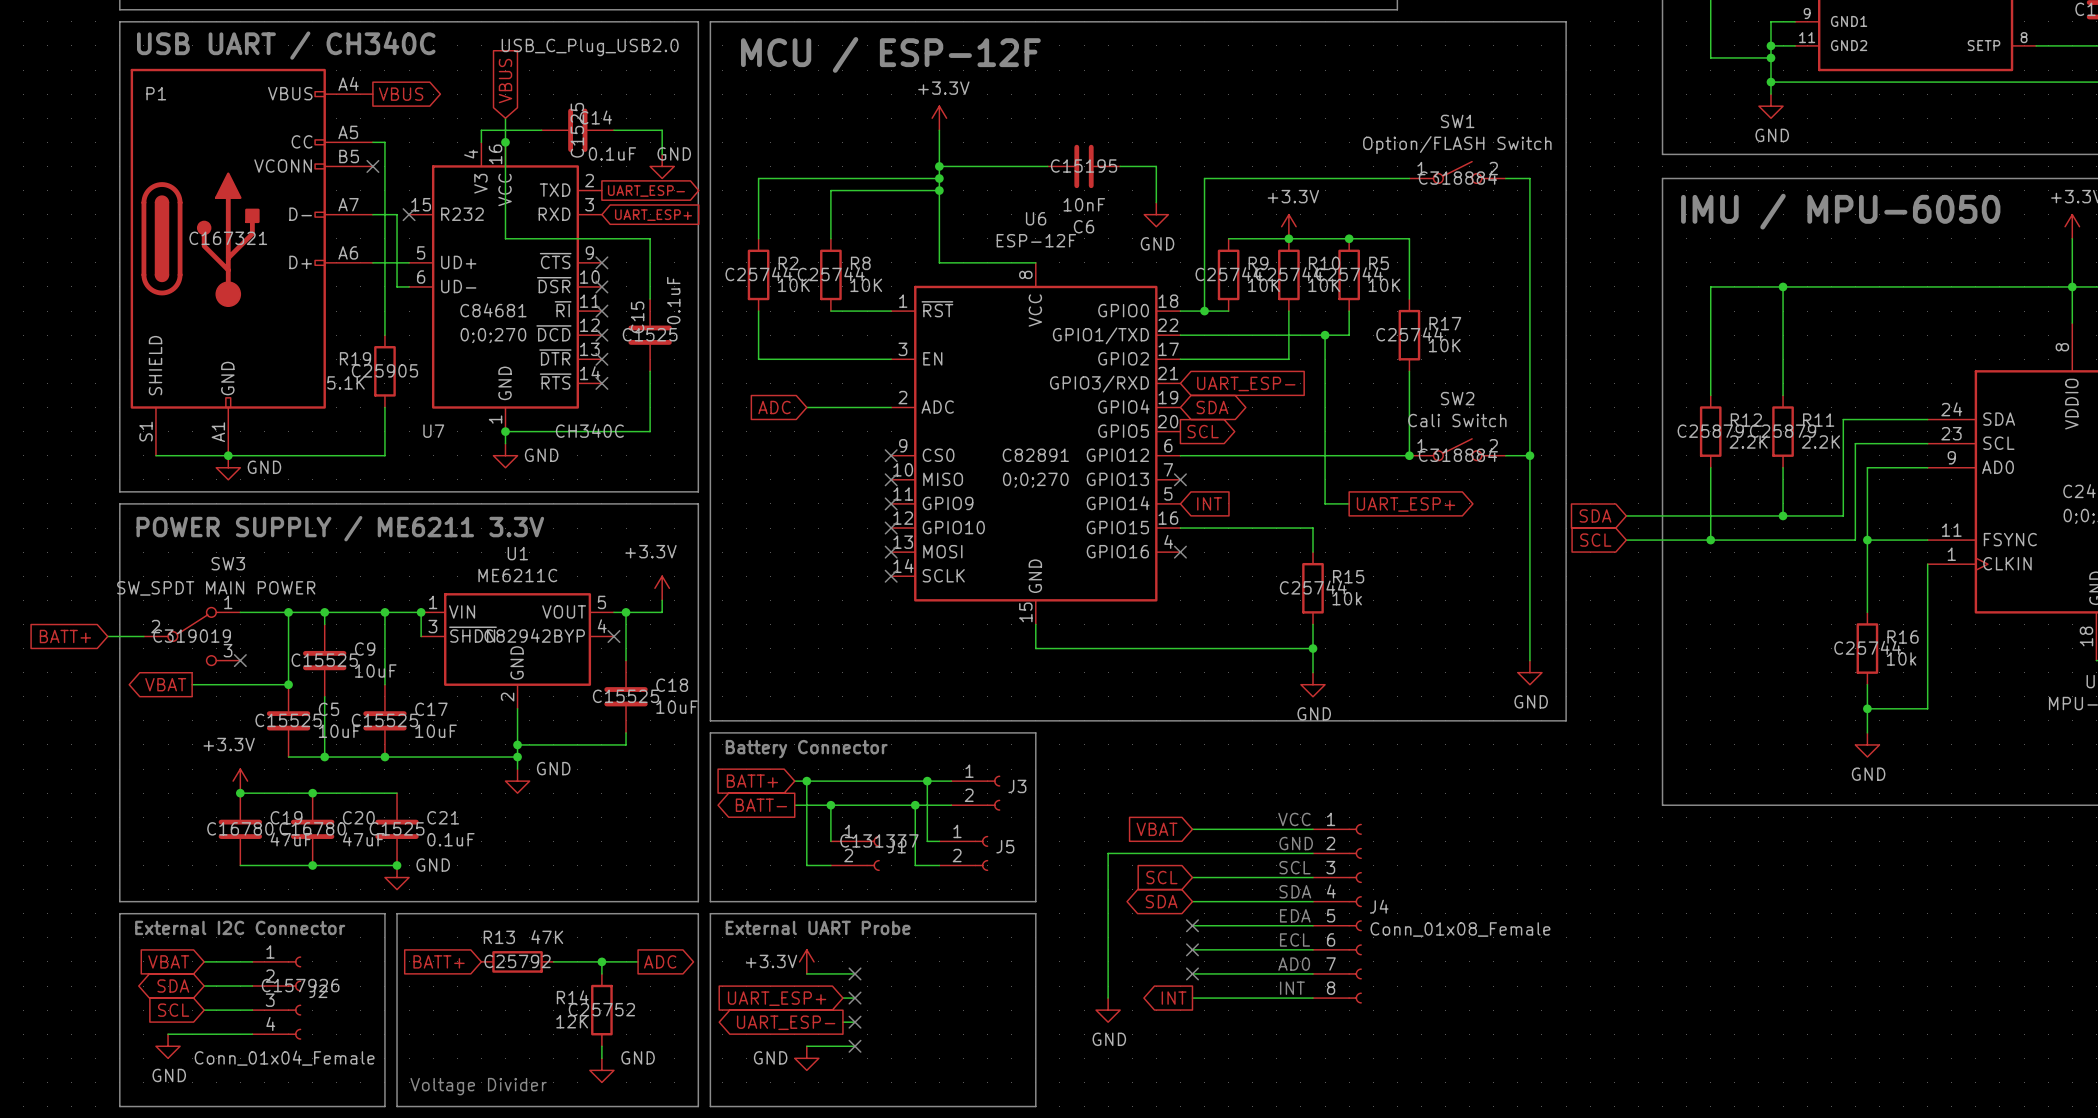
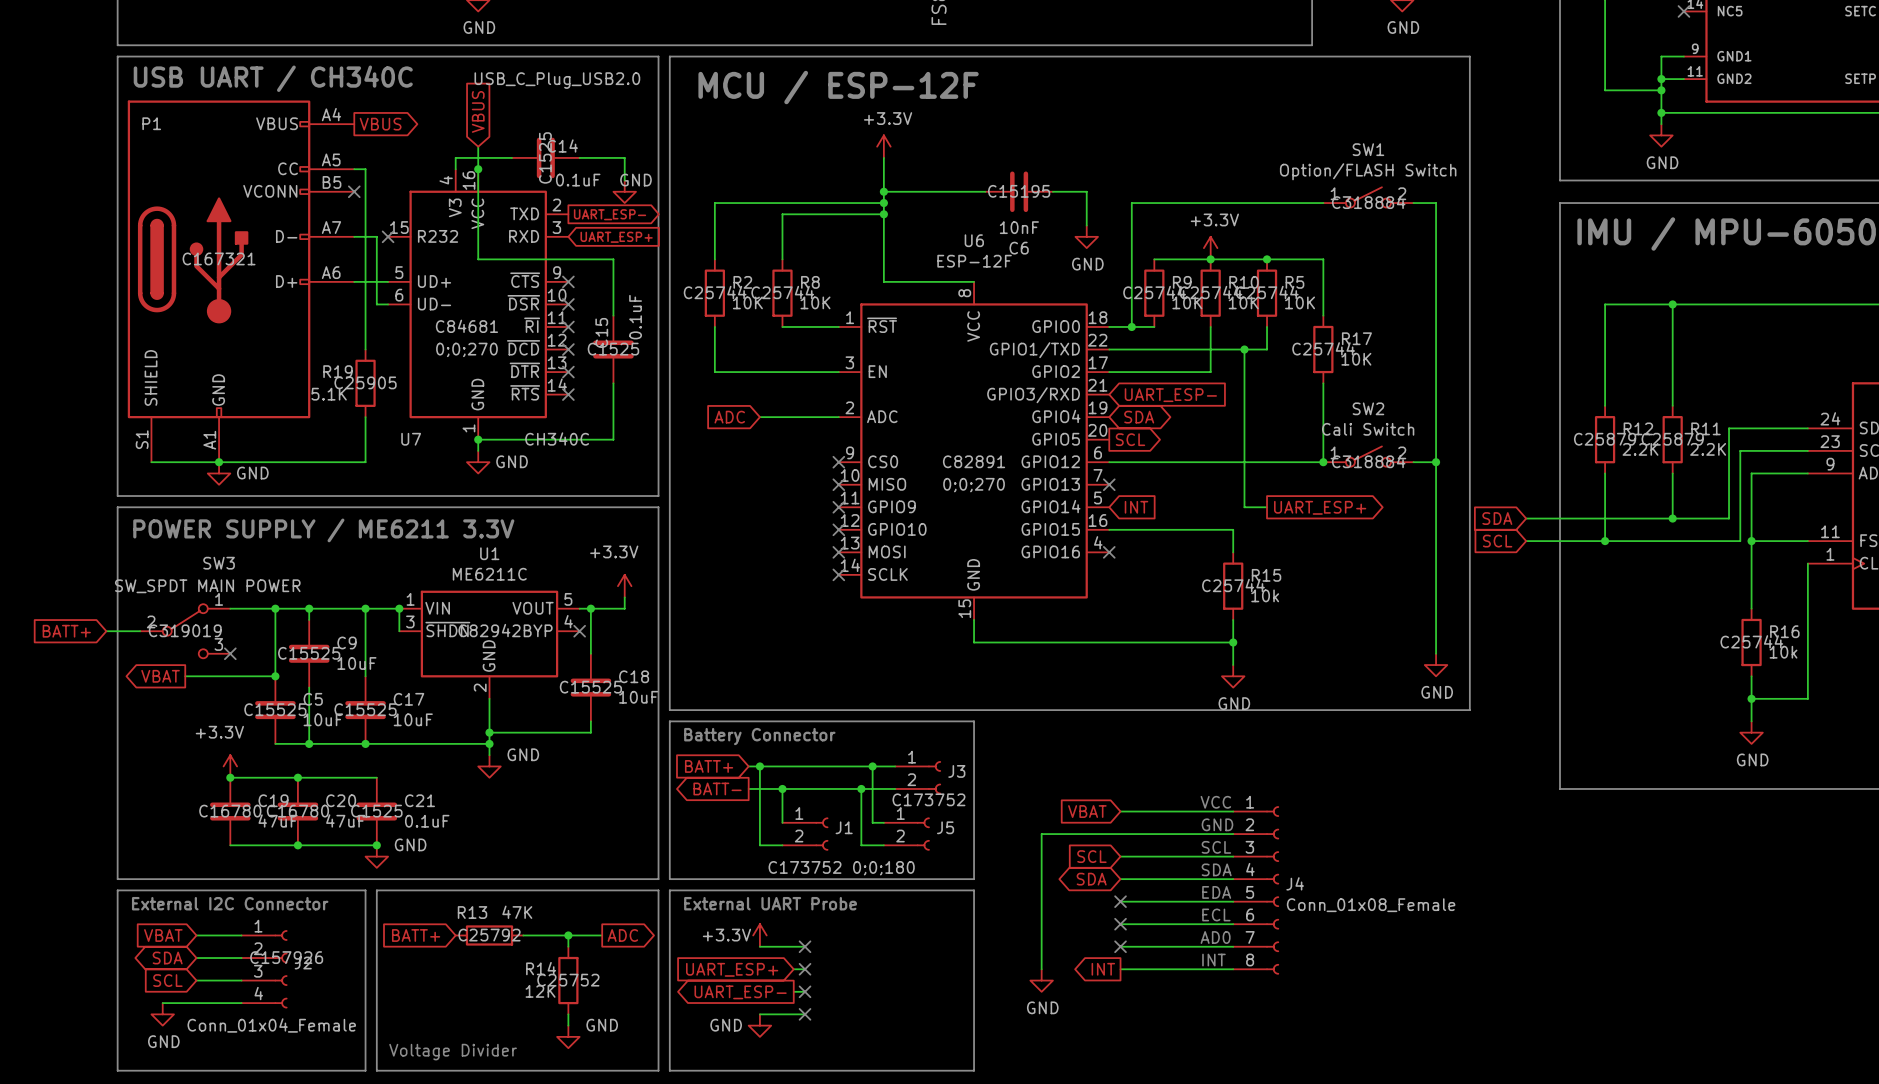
J3 text: none -> C173752 (928, 799)
J1 text: C131337 (879, 840) -> C173752 (805, 867)
J1 text: none -> 0;0;180 (883, 868)

